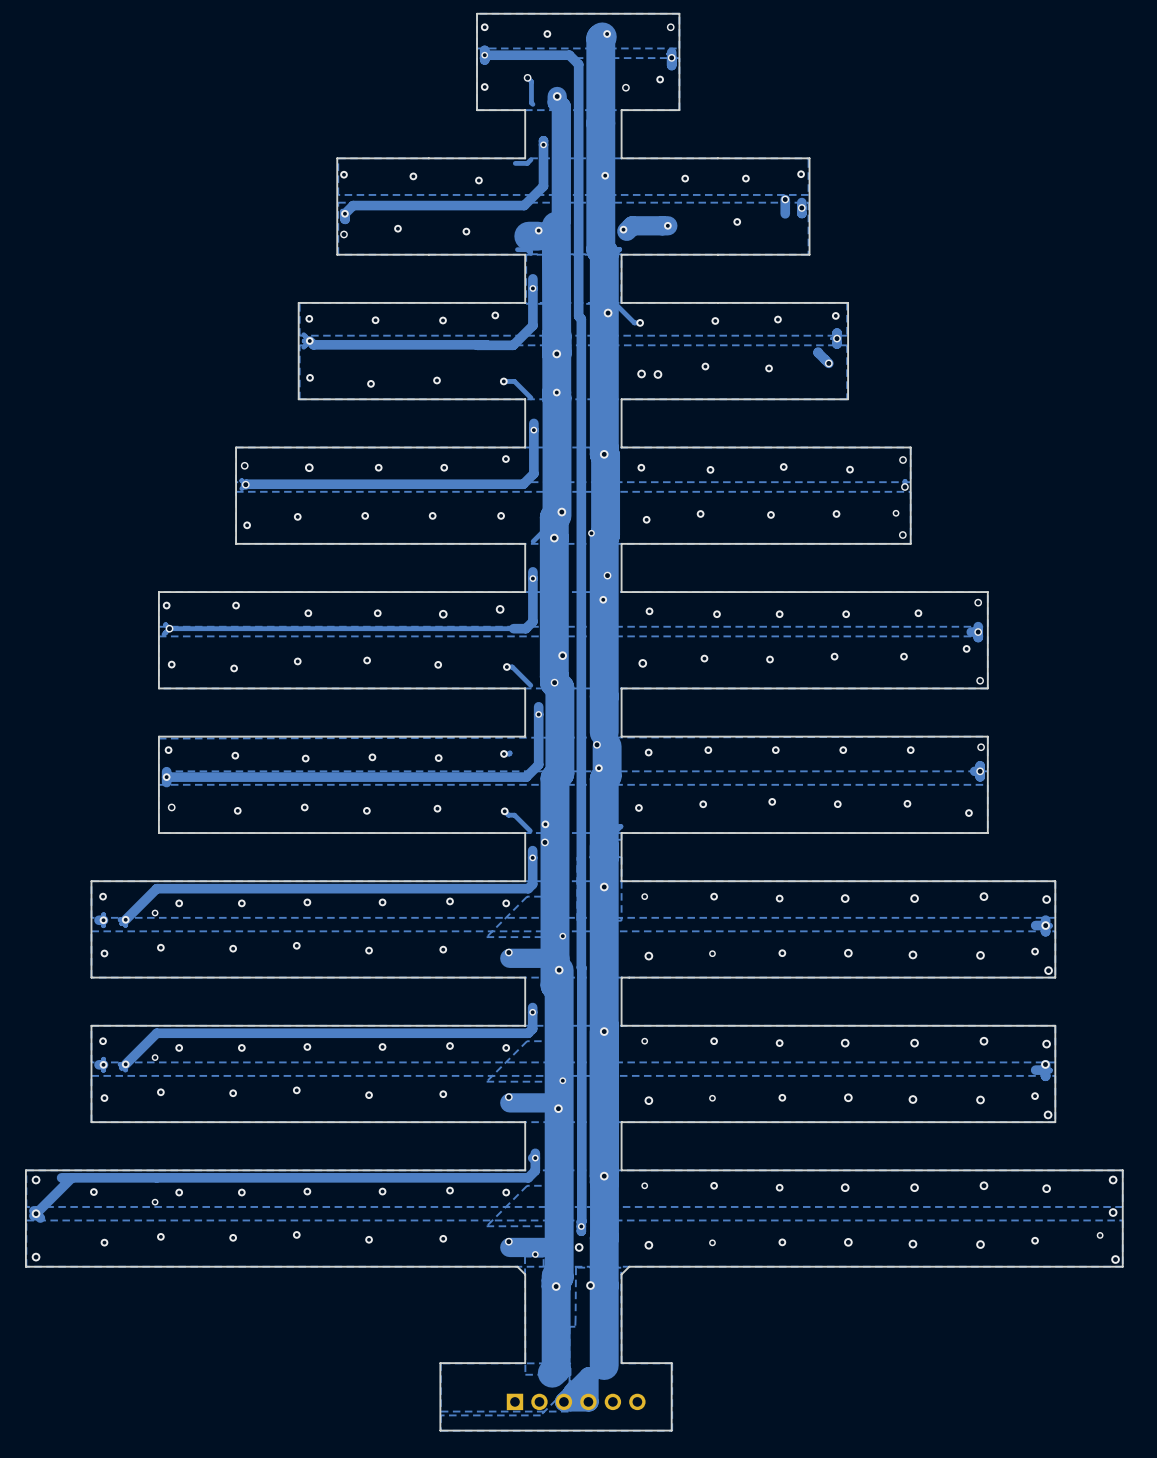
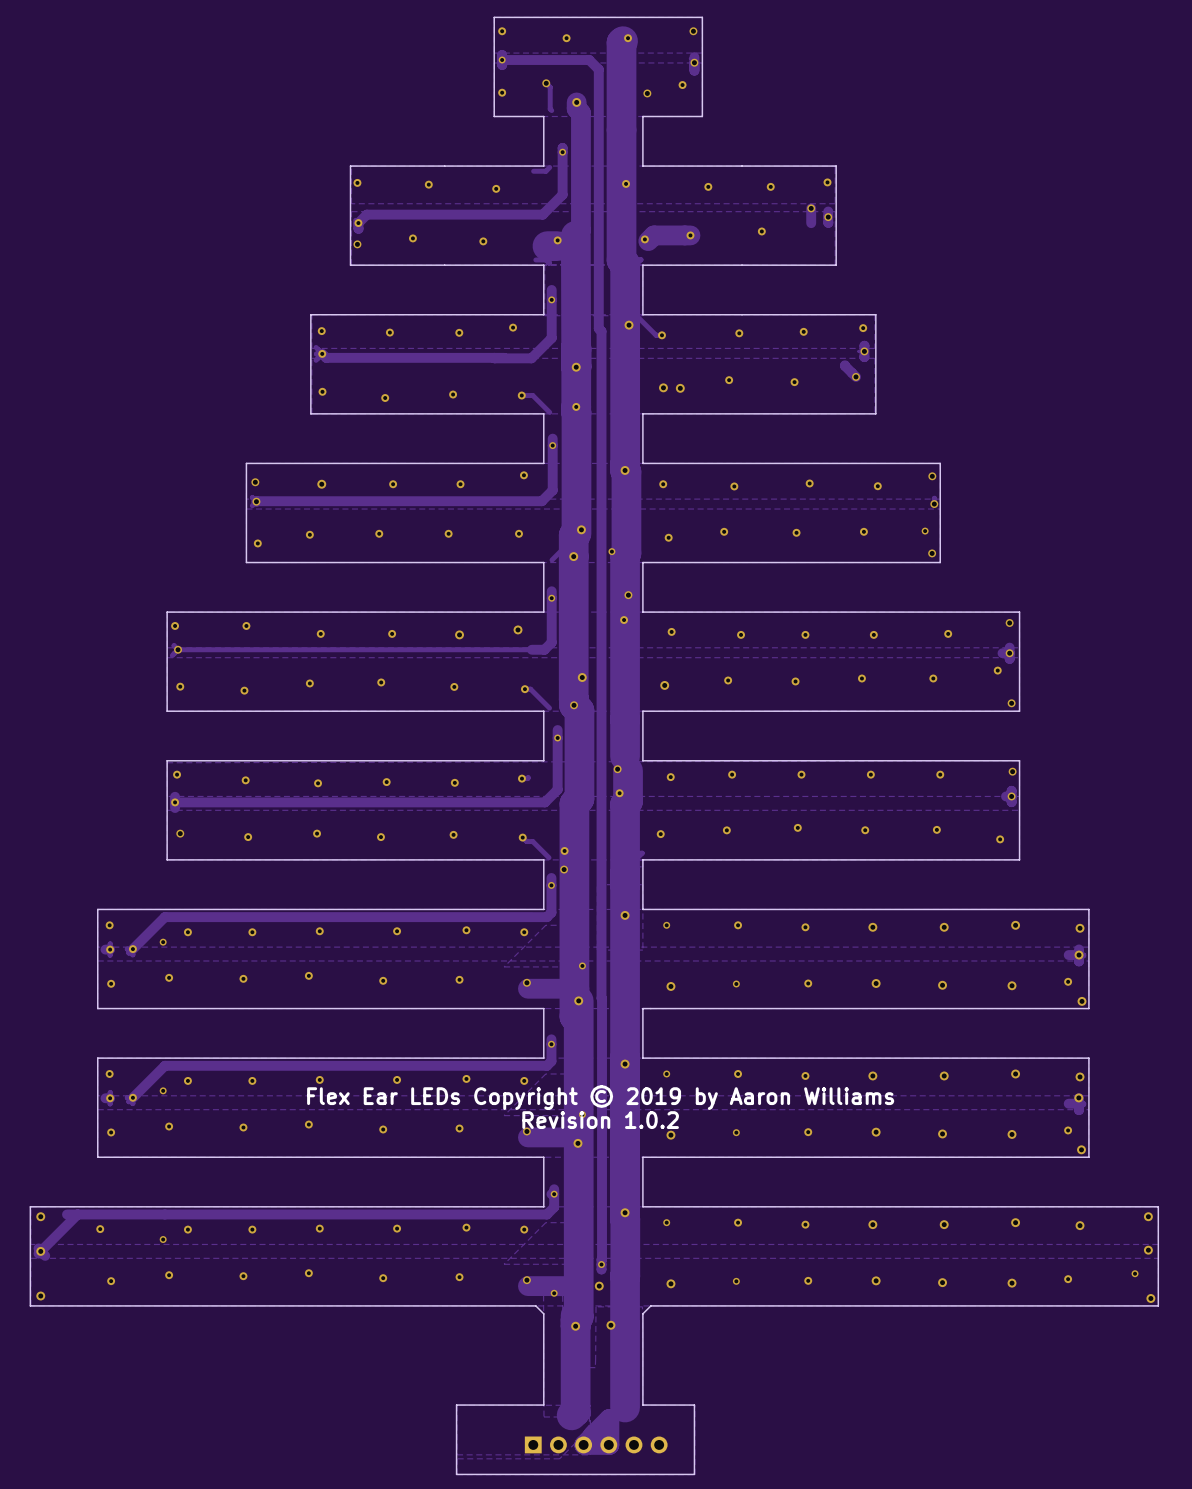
text: none -> Flex Ear LEDs Copyright © 2019 by Aaron Williams (600, 1097)
text: none -> Revision 1.0.2 (600, 1120)

